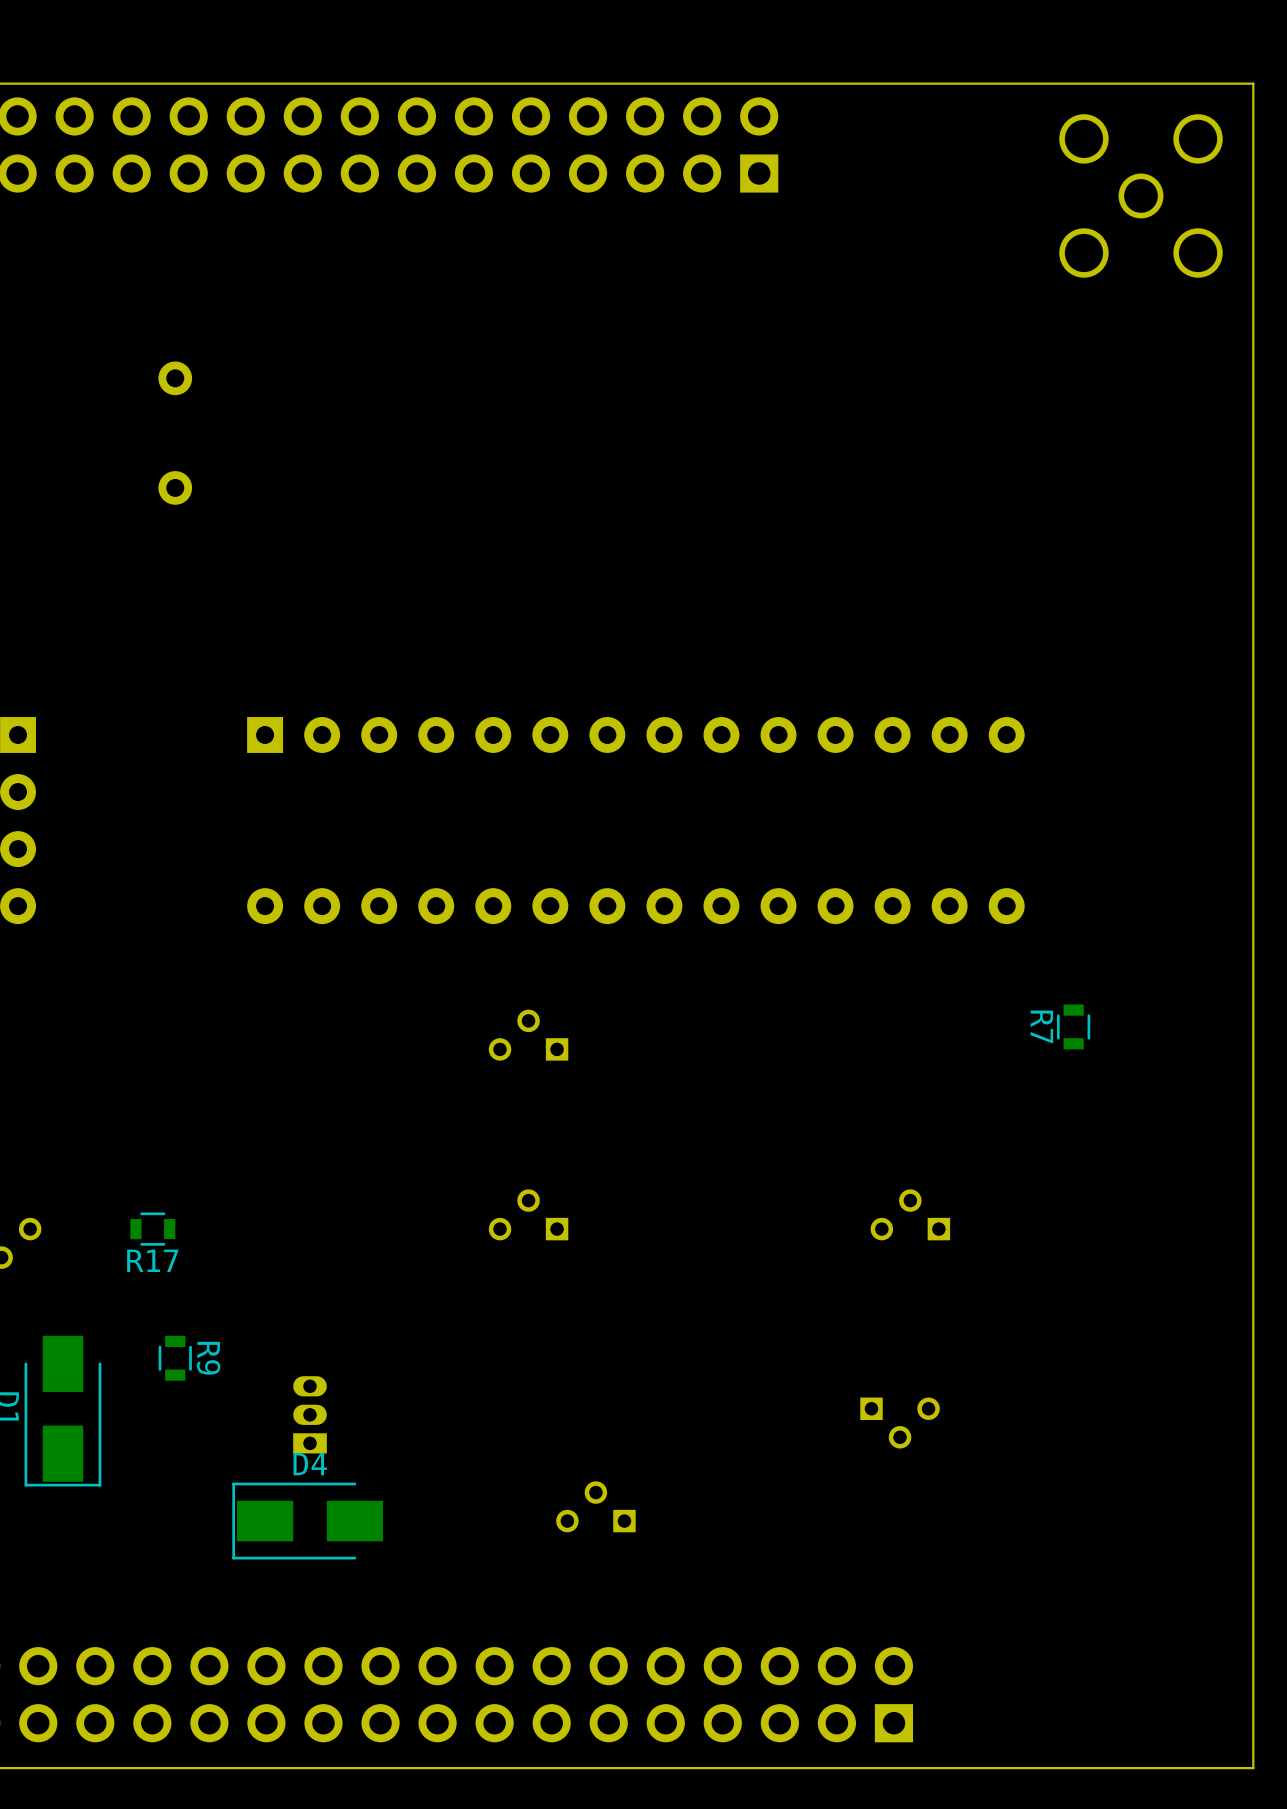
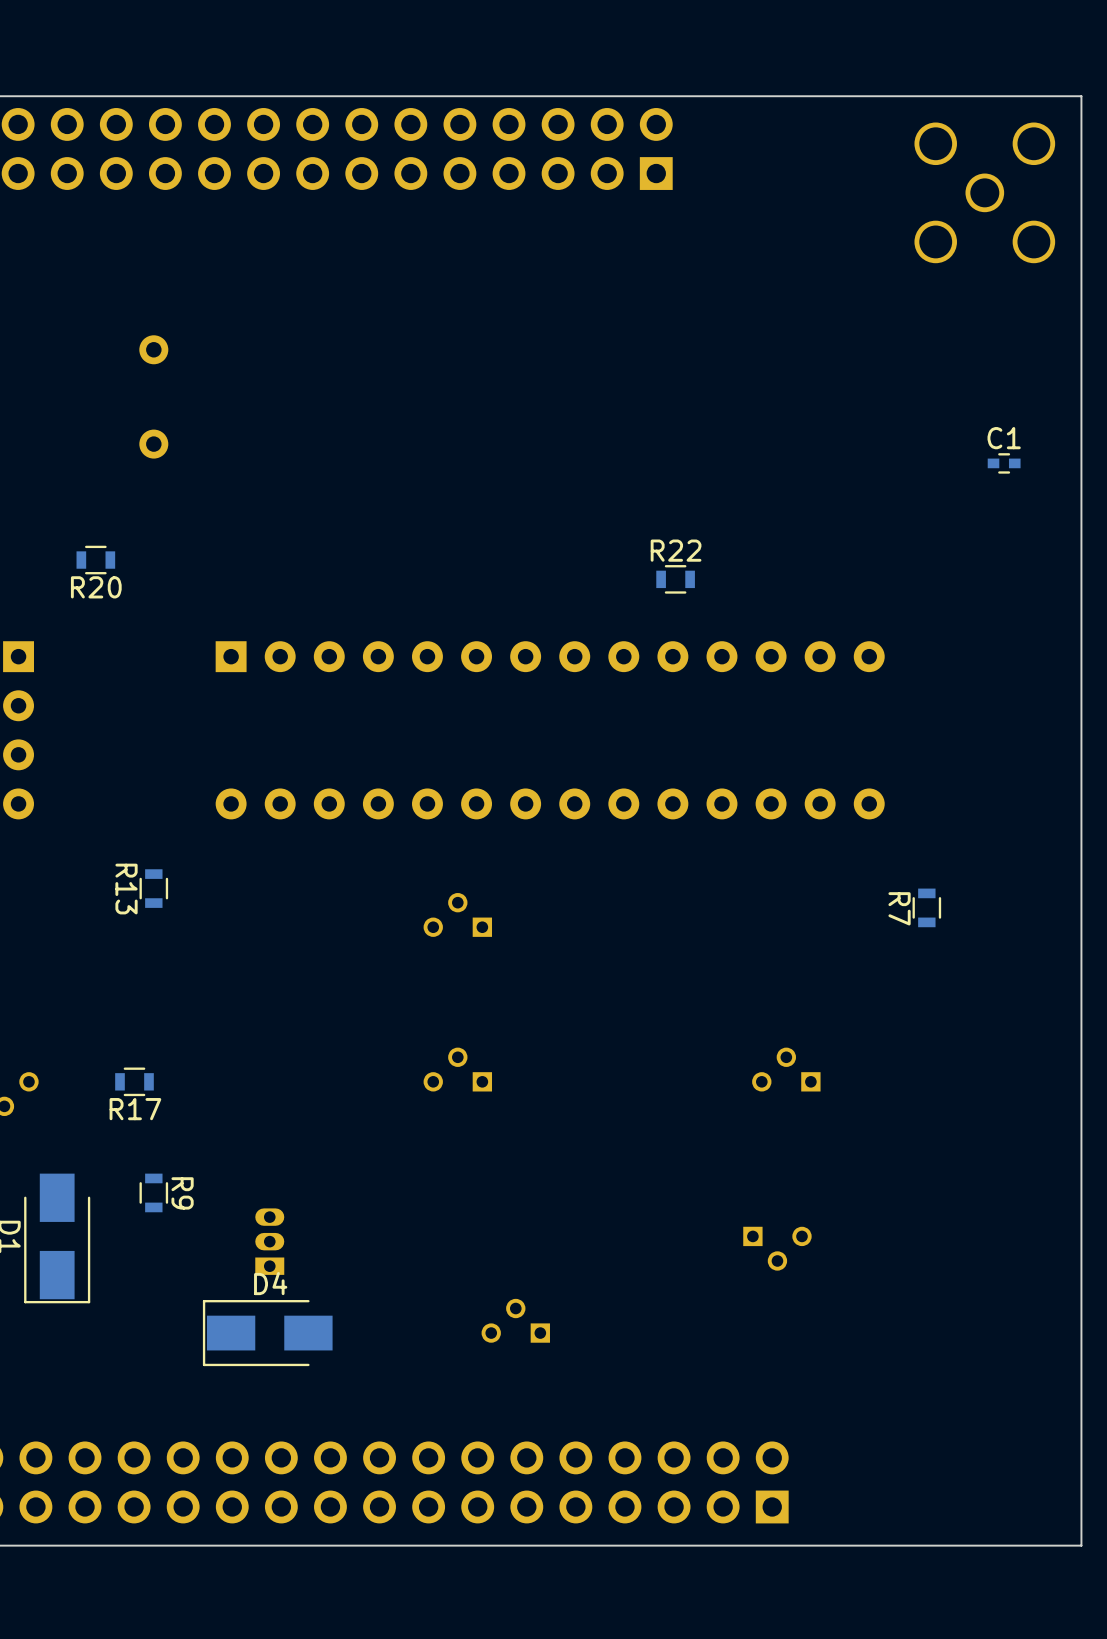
C1: none -> (1004, 463)
R20: none -> (95, 560)
R22: none -> (675, 579)
R13: none -> (153, 888)

